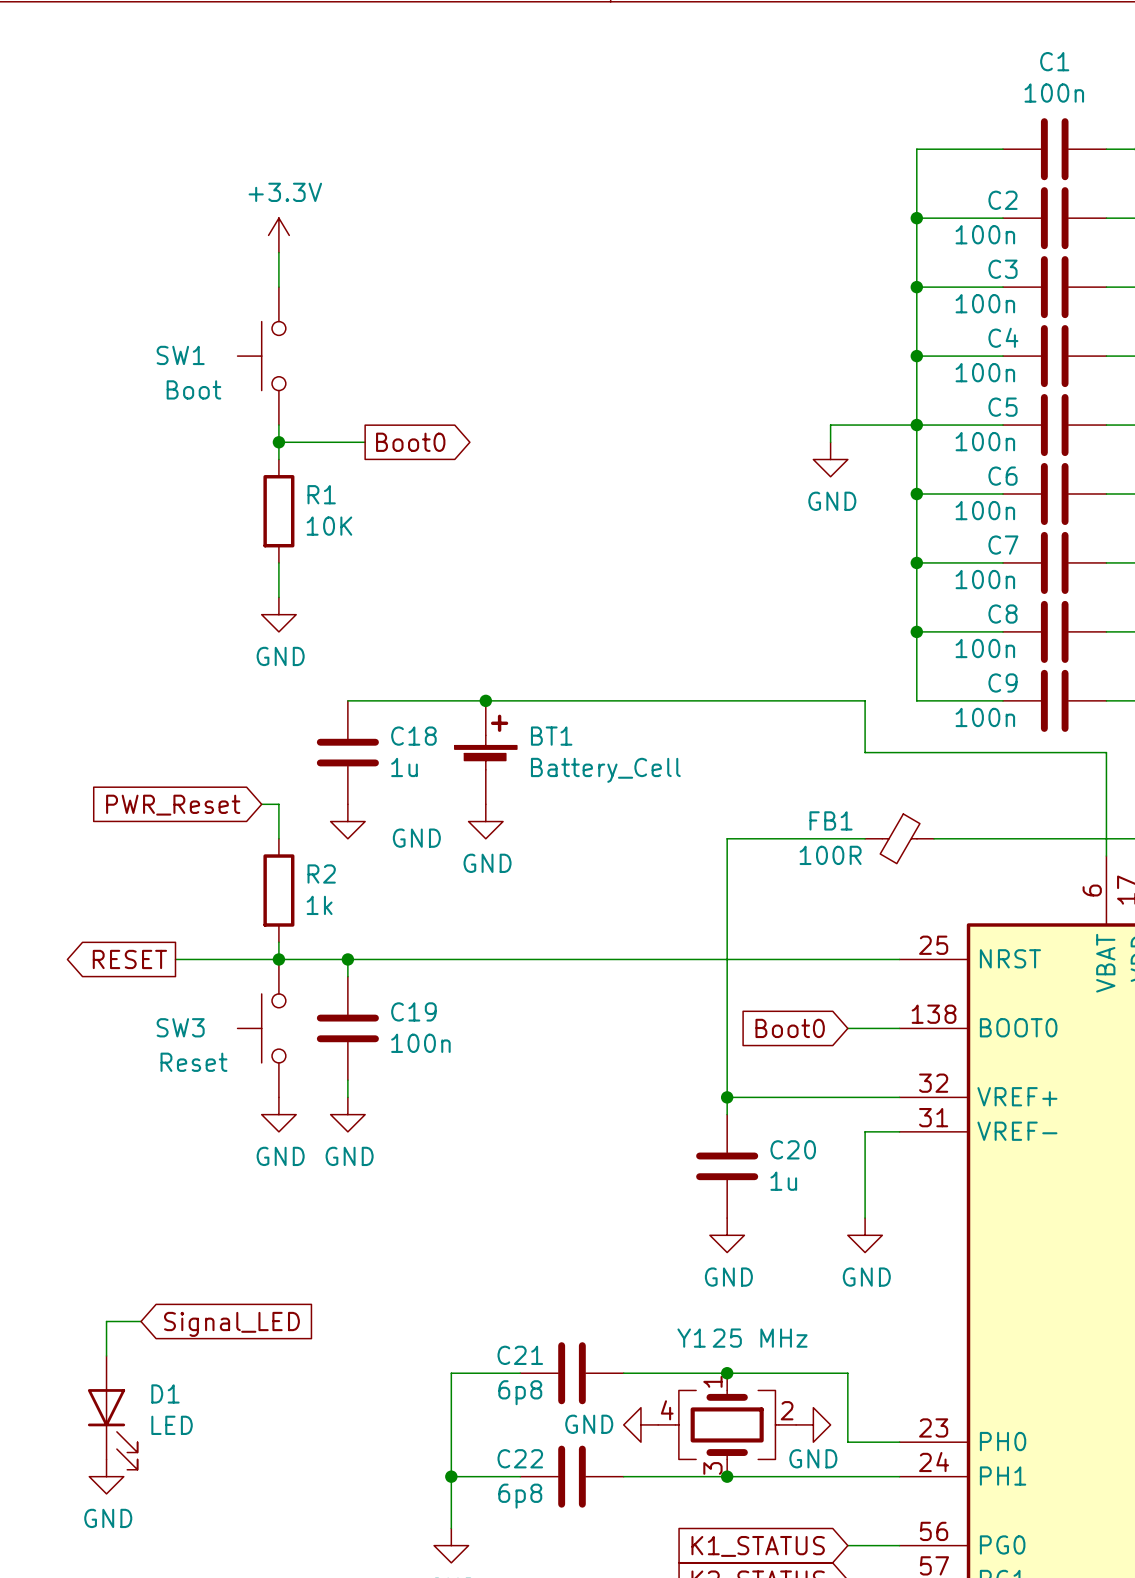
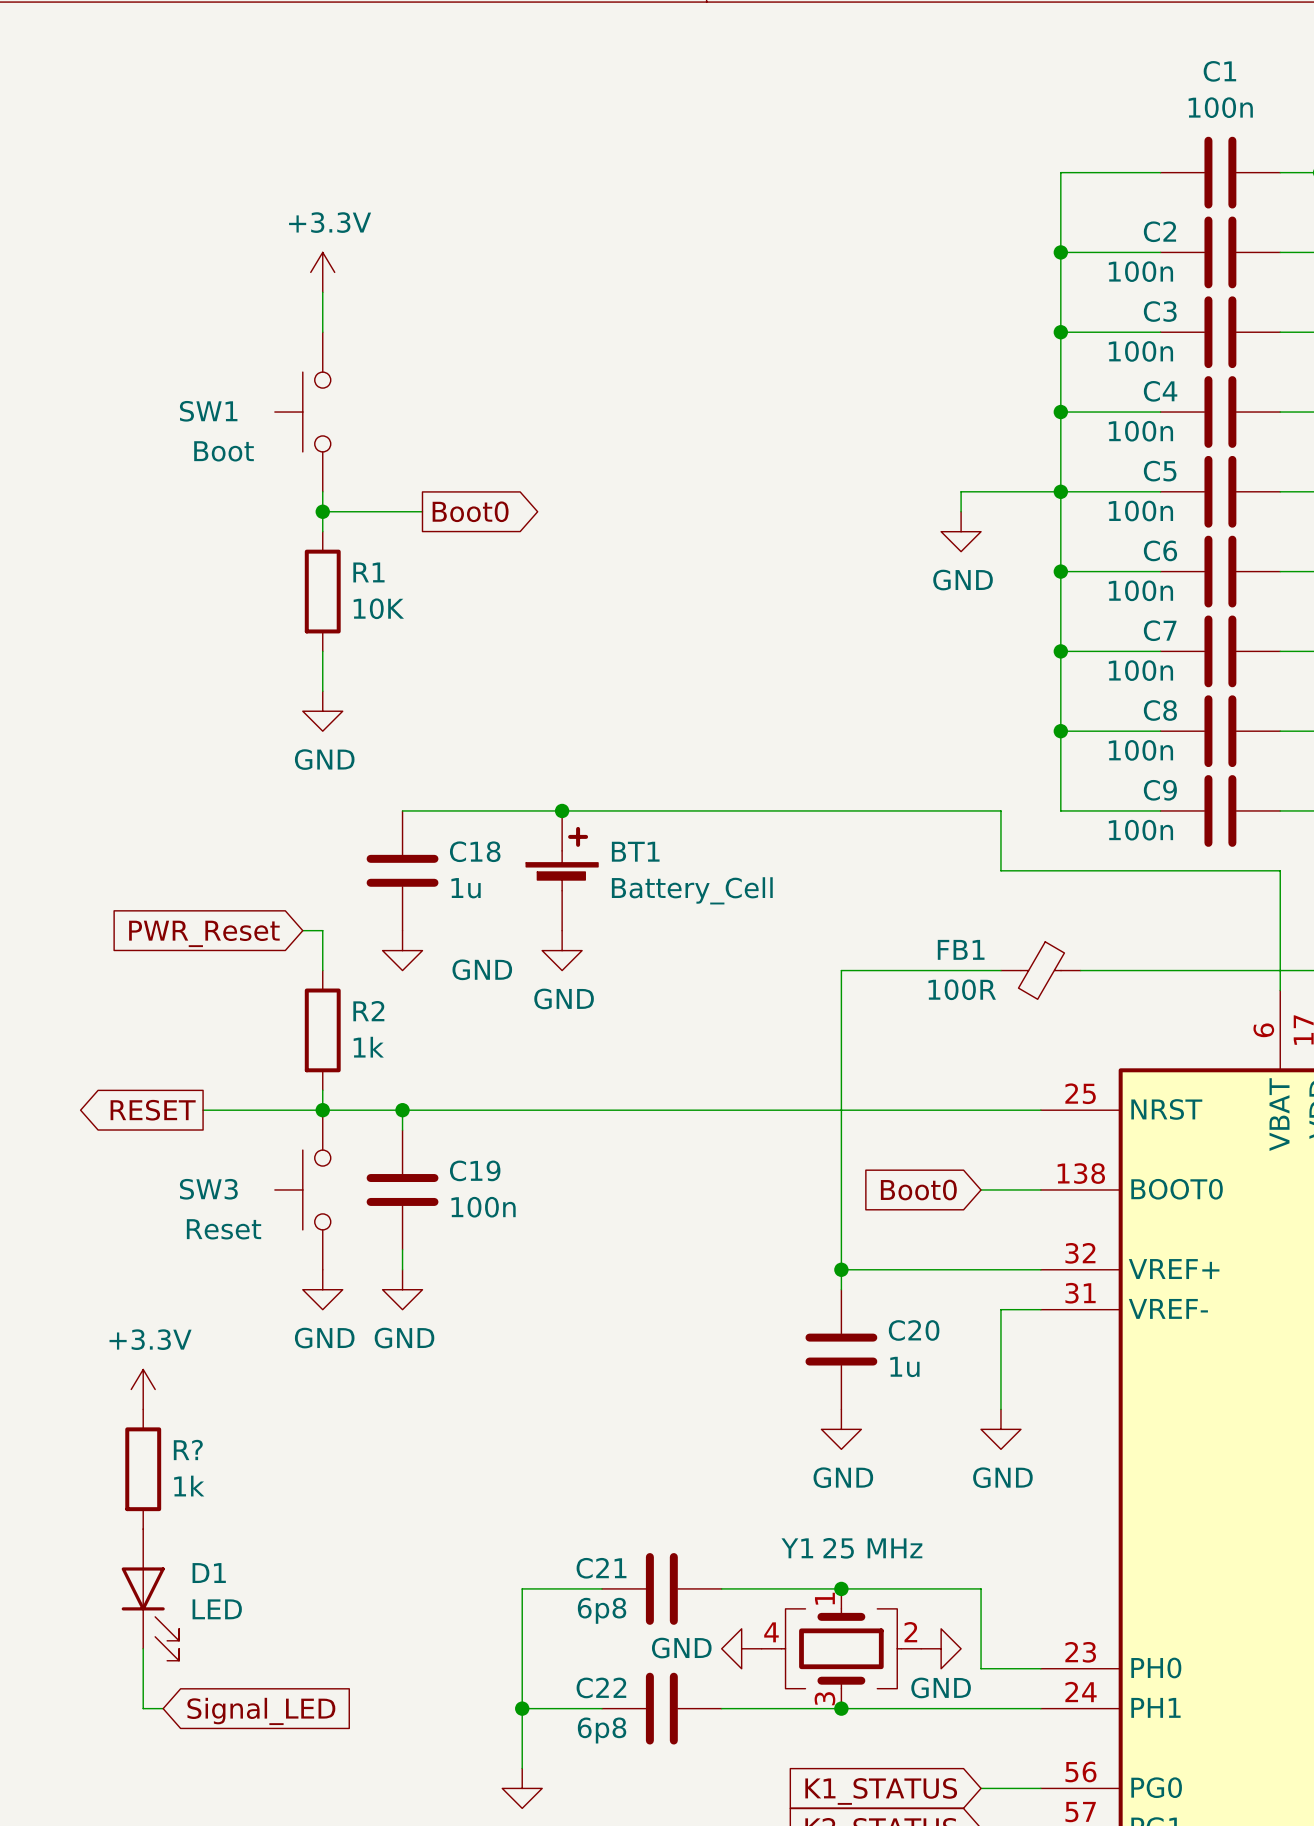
power symbol: none -> +3.3V (143, 1389)
R?: none -> 1k (143, 1469)
wire: (141, 1321) (106, 1321) (106, 1355) -> none
global label position: Signal_LED (231, 1324) -> Signal_LED (261, 1711)
D1 position: (112, 1412) -> (150, 1594)
wire: none -> (143, 1648) (143, 1708) (163, 1708)
power symbol: GND (106, 1476) -> none

